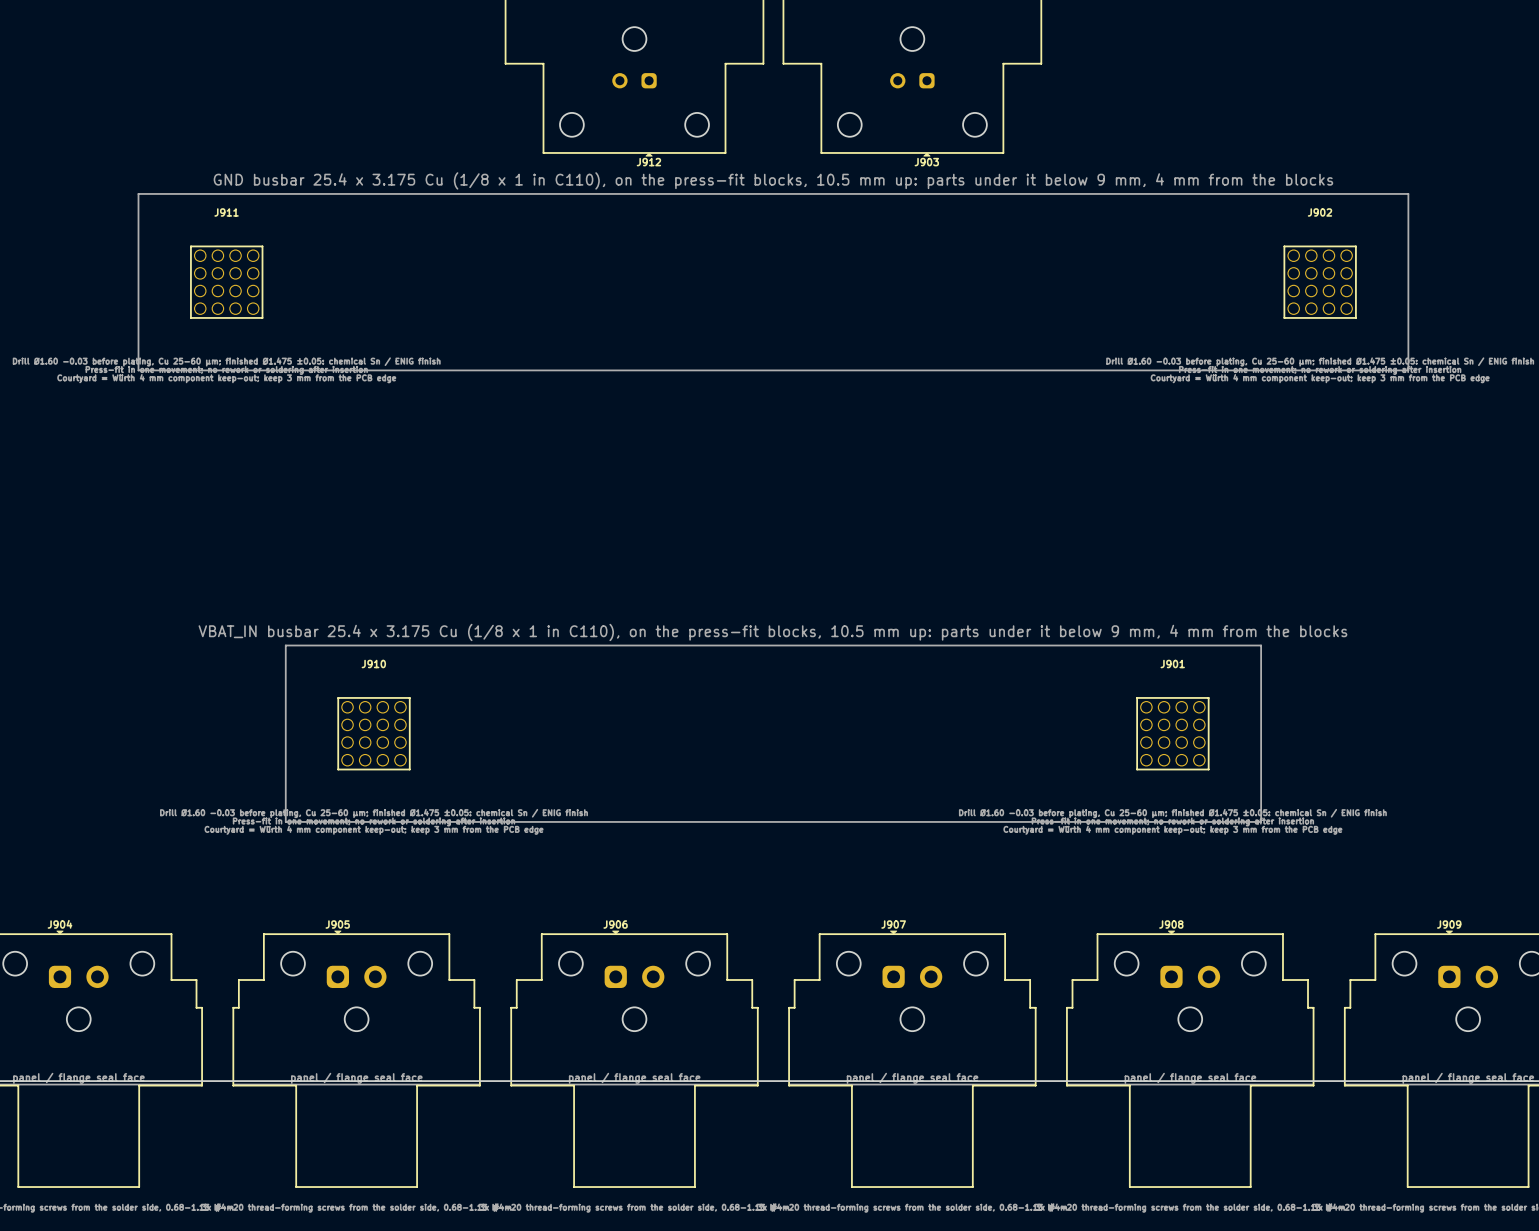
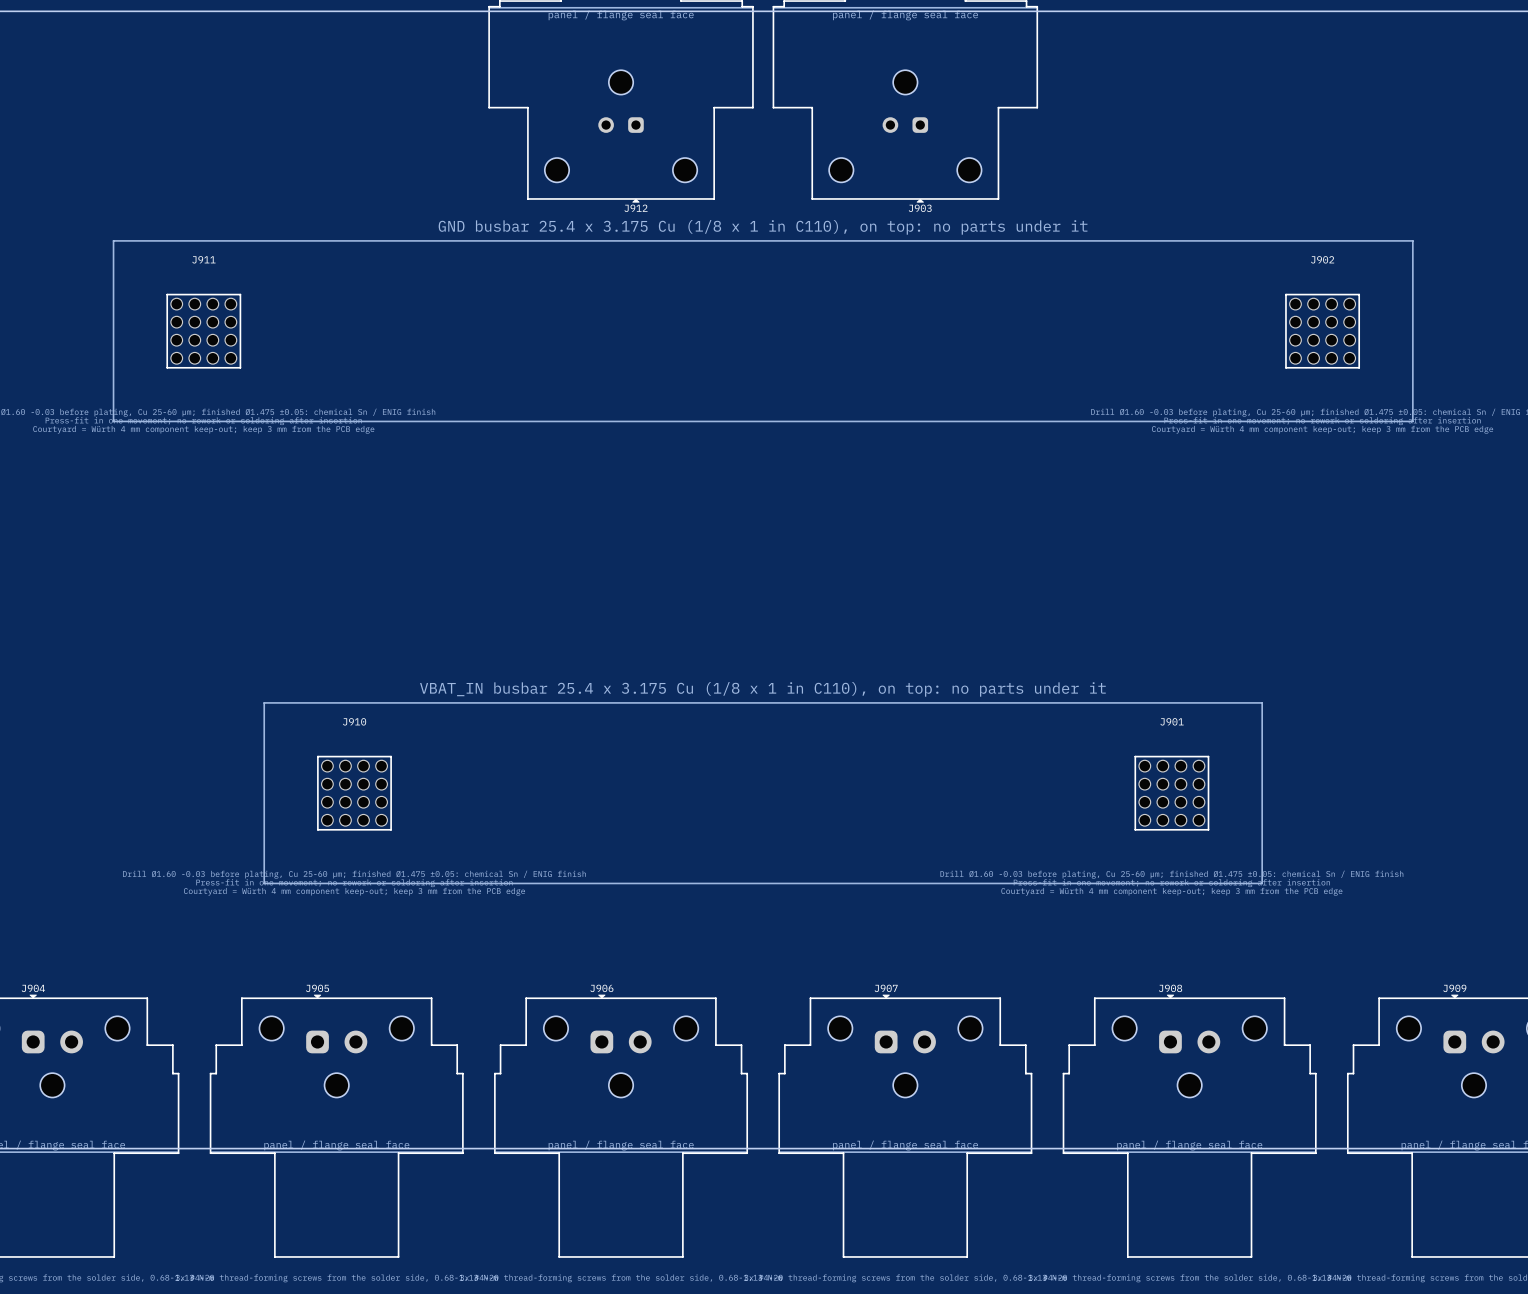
text: GND busbar 25.4 x 3.175 Cu (1/8 x 1 in C110), on the press-fit blocks, 10.5 mm up: parts under it below 9 mm, 4 mm from the blocks (773, 180) -> GND busbar 25.4 x 3.175 Cu (1/8 x 1 in C110), on top: no parts under it (763, 227)
text: VBAT_IN busbar 25.4 x 3.175 Cu (1/8 x 1 in C110), on the press-fit blocks, 10.5 mm up: parts under it below 9 mm, 4 mm from the blocks (772, 632) -> VBAT_IN busbar 25.4 x 3.175 Cu (1/8 x 1 in C110), on top: no parts under it (762, 689)

